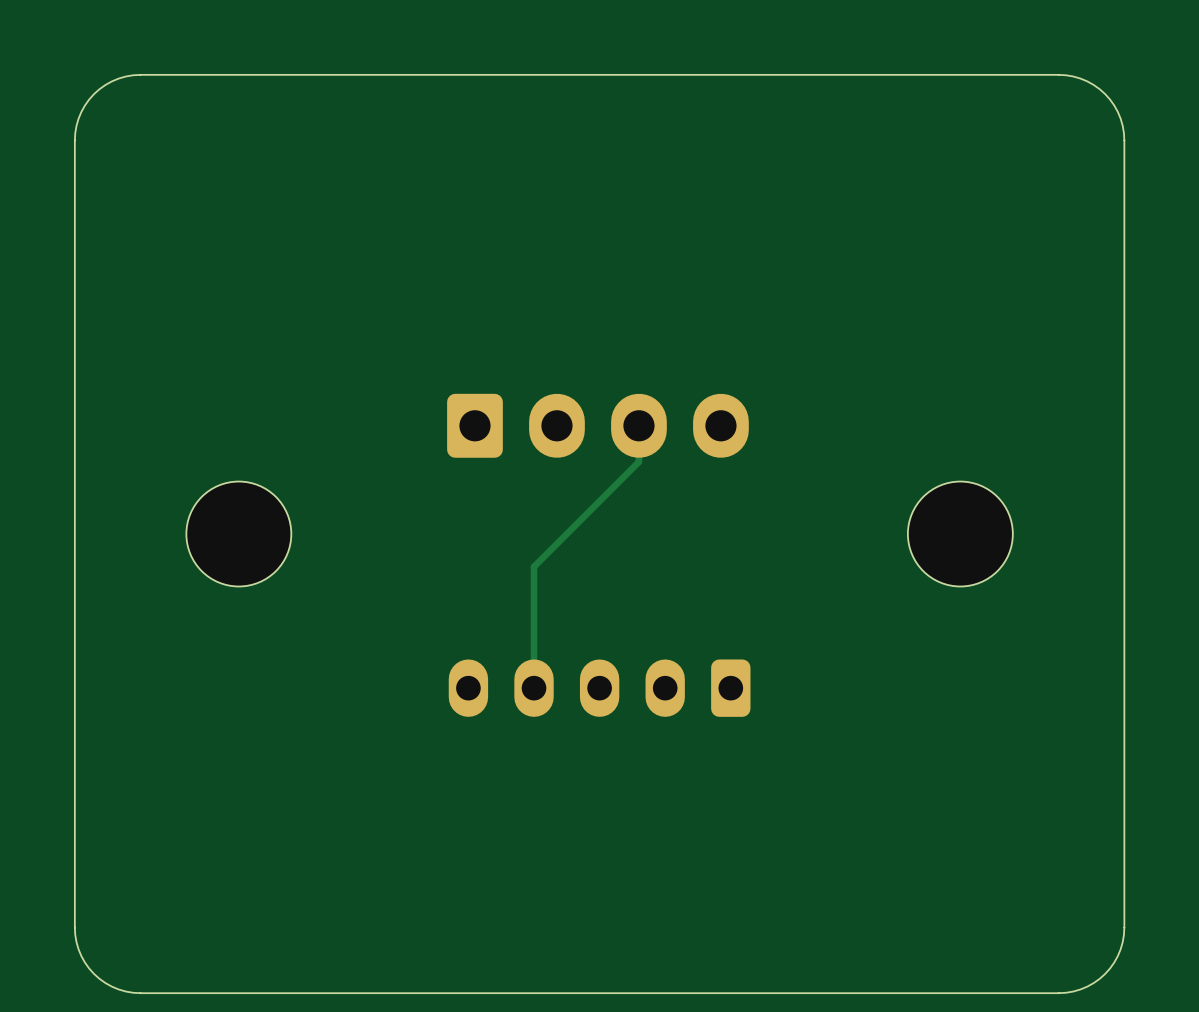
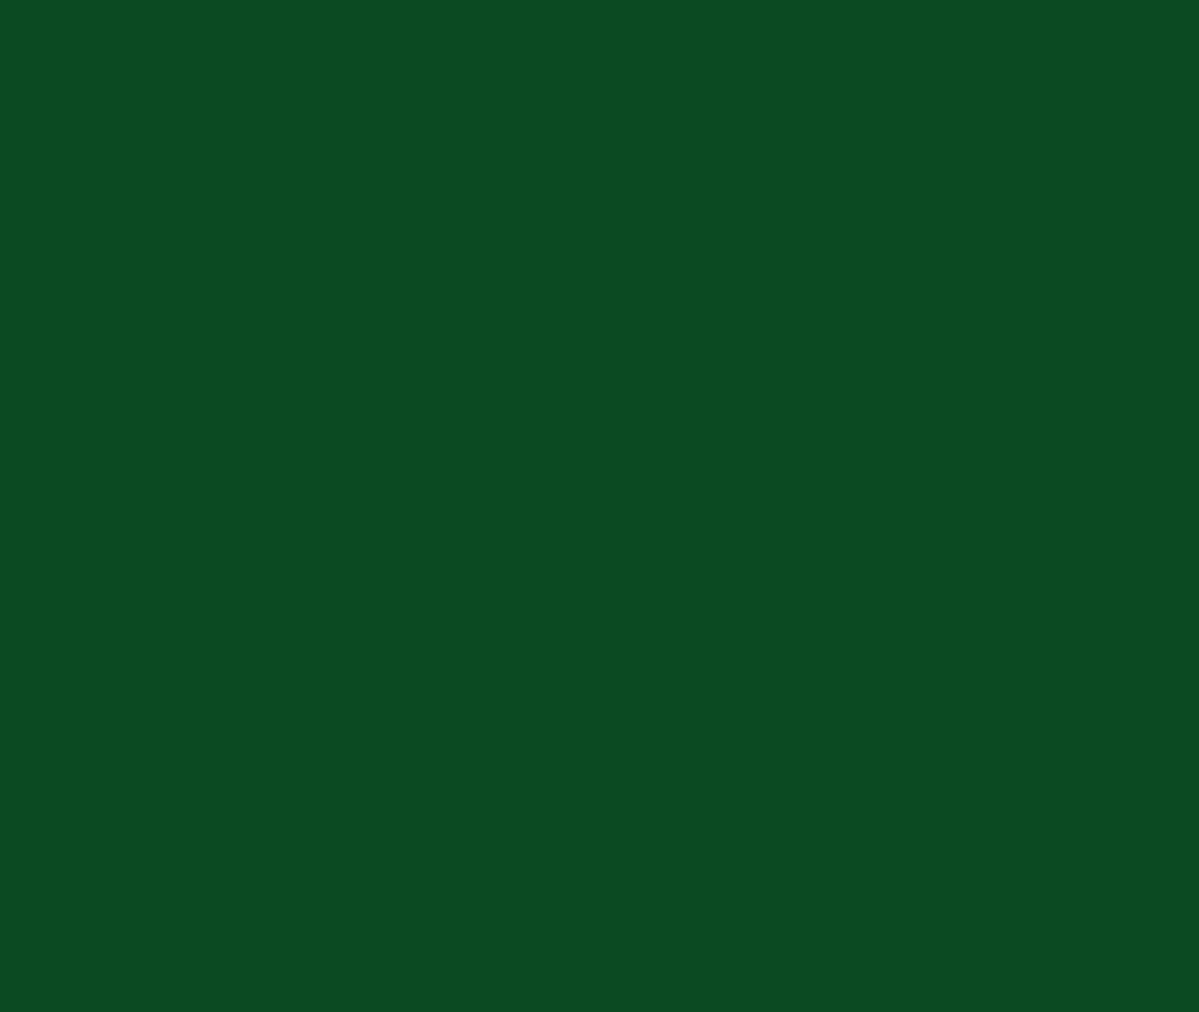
board edge: (1058, 74) (140, 74) (125, 76) (111, 81) (94, 94) (81, 111) (76, 125) (74, 140) (74, 927) (78, 949) (84, 962) (94, 973) (105, 983) (118, 989) (140, 993) (1058, 993) (1080, 989) (1093, 983) (1105, 973) (1117, 956) (1122, 942) (1124, 927) (1124, 140) (1120, 118) (1114, 105) (1105, 94) (1087, 81) (1073, 76) (1058, 74) -> none
part: (597, 425) -> none
track: (638, 425) (638, 461) (534, 566) (534, 688) -> none
part: (238, 534) -> none
part: (960, 534) -> none
part: (599, 688) -> none

